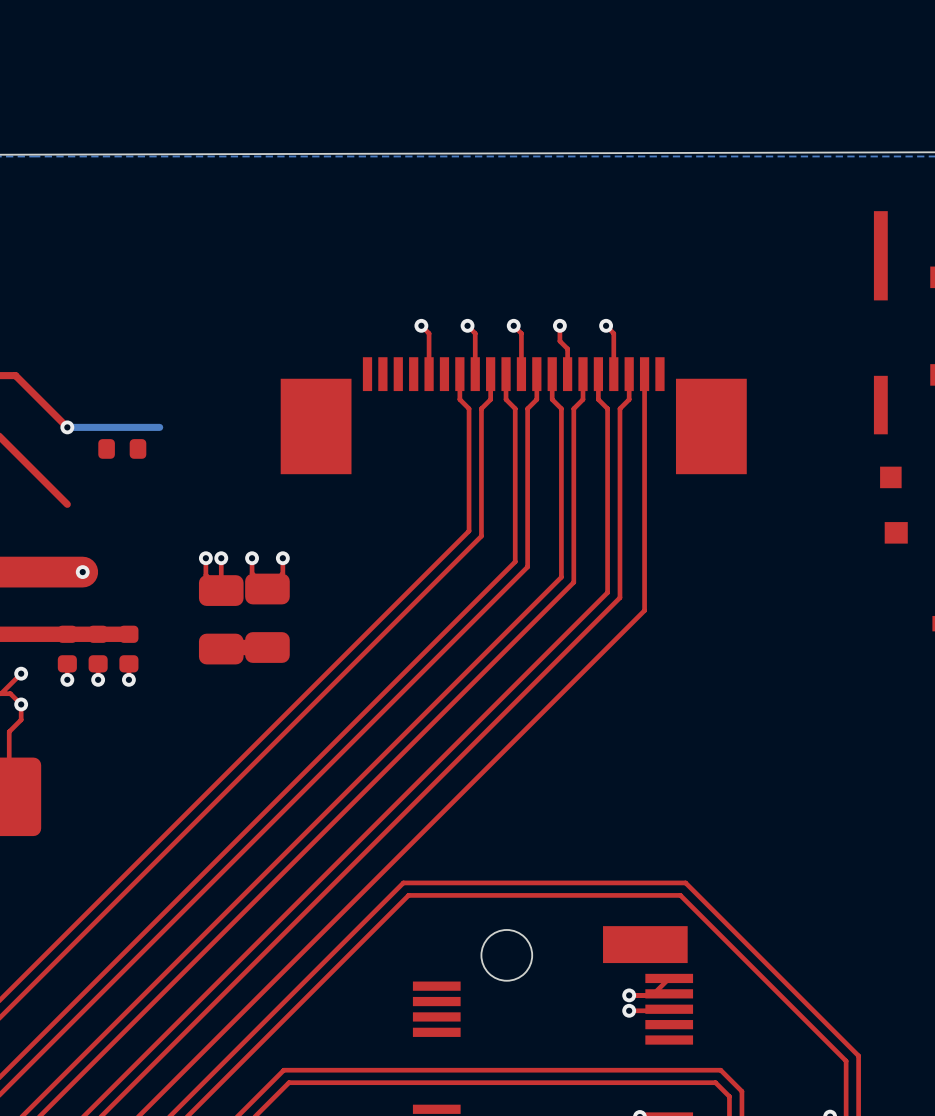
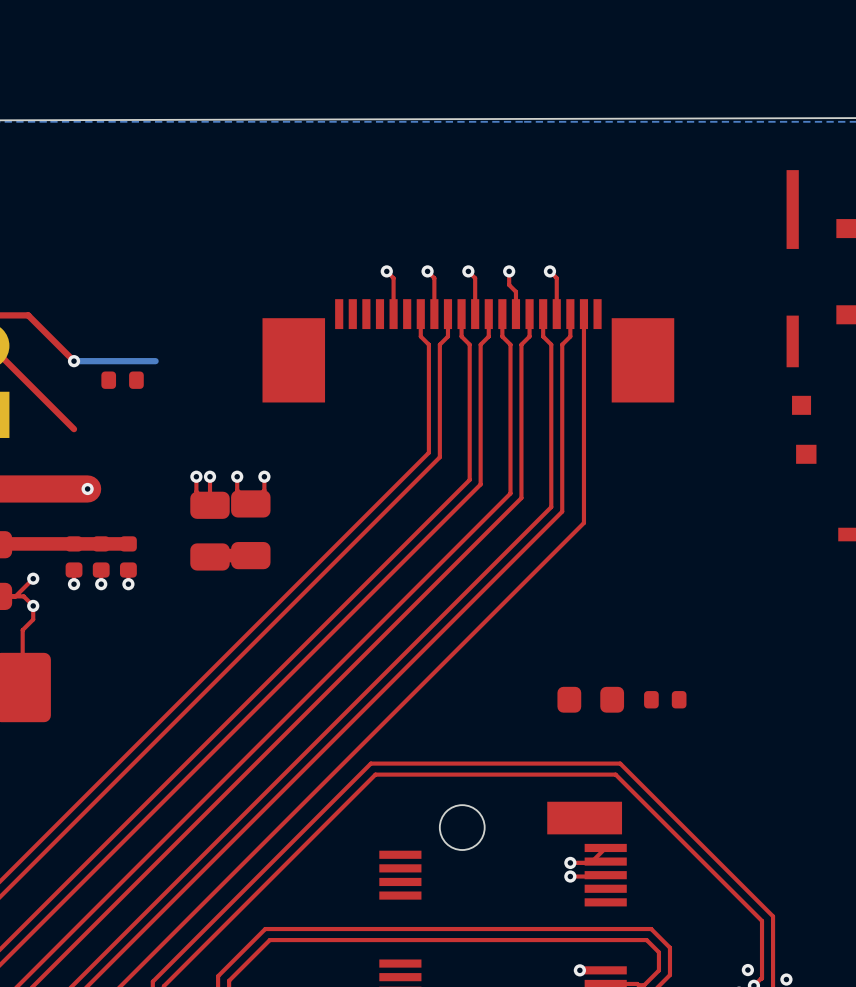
part: none -> (590, 699)
part: none -> (665, 699)

